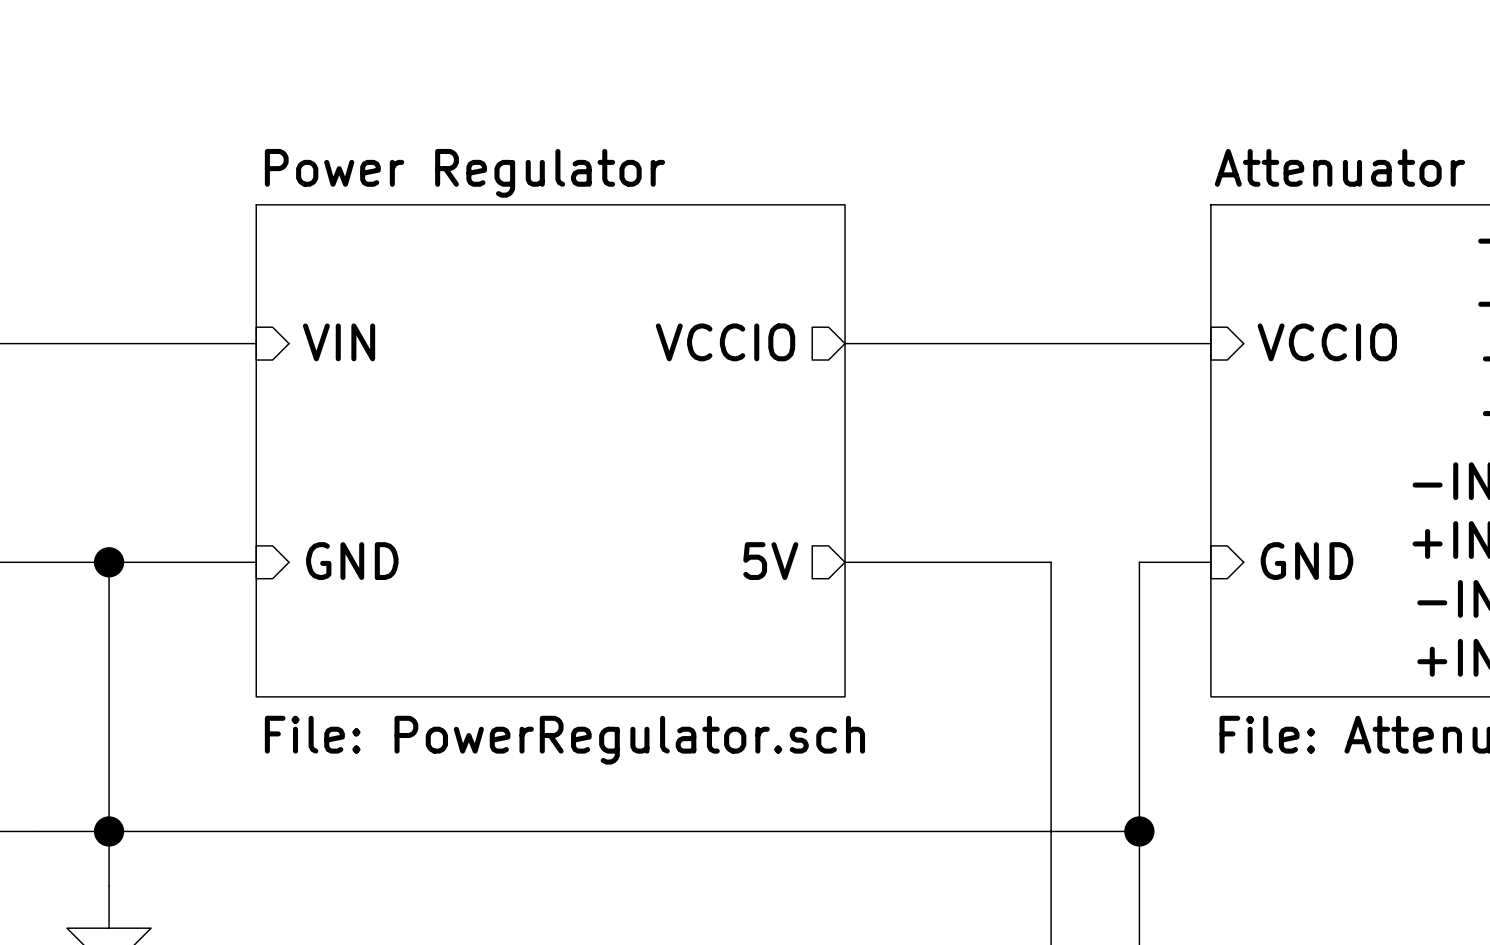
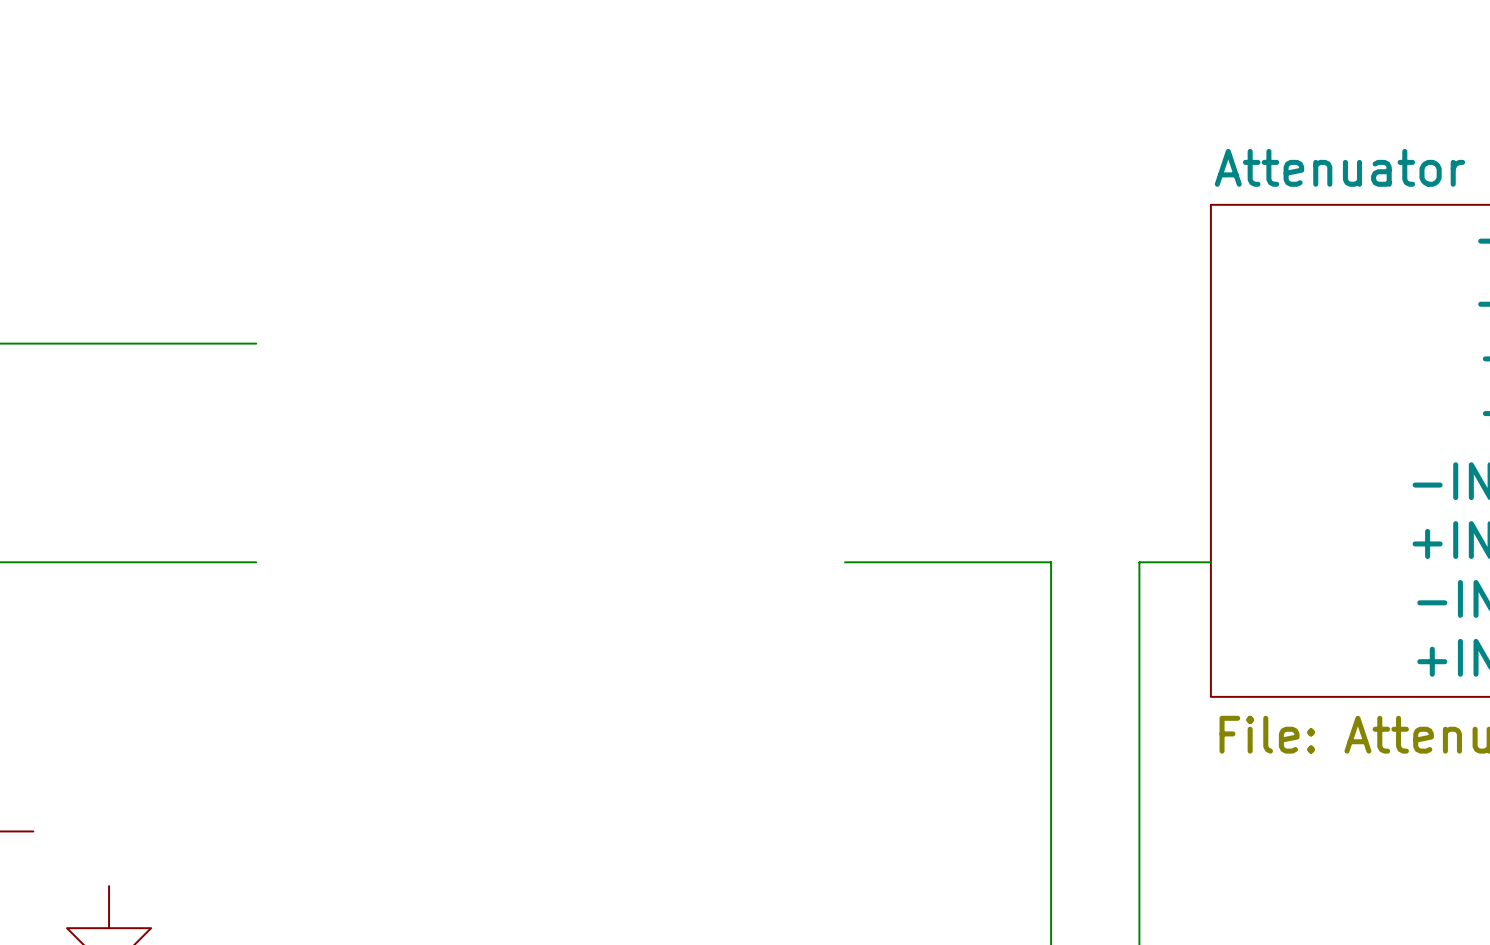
sheet pin: VIN (339, 342) -> none
sheet pin: VCCIO (725, 342) -> none
sheet pin: VCCIO (1327, 342) -> none
wire: (845, 343) (1210, 343) -> none
sheet Power Regulator: File: PowerRegulator.sch (550, 450) -> none
sheet pin: GND (352, 561) -> none
sheet pin: 5V (770, 561) -> none
sheet pin: GND (1306, 561) -> none
wire: (109, 562) (109, 886) -> none
junction: (109, 562) -> none
wire: (33, 831) (1139, 831) -> none
junction: (109, 831) -> none
junction: (1139, 831) -> none

